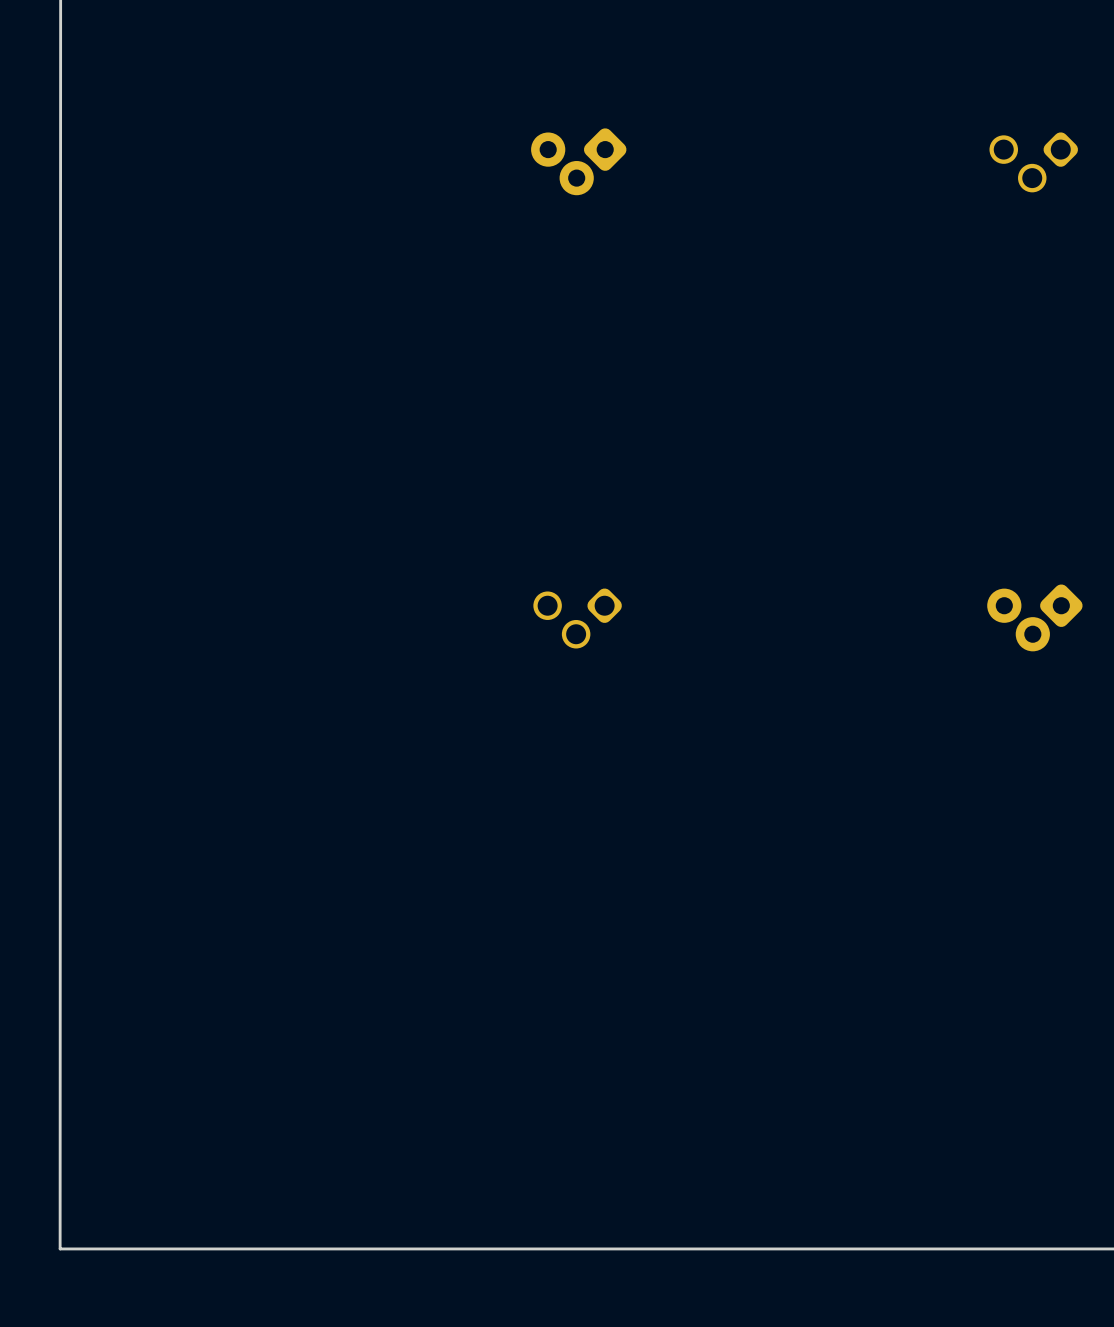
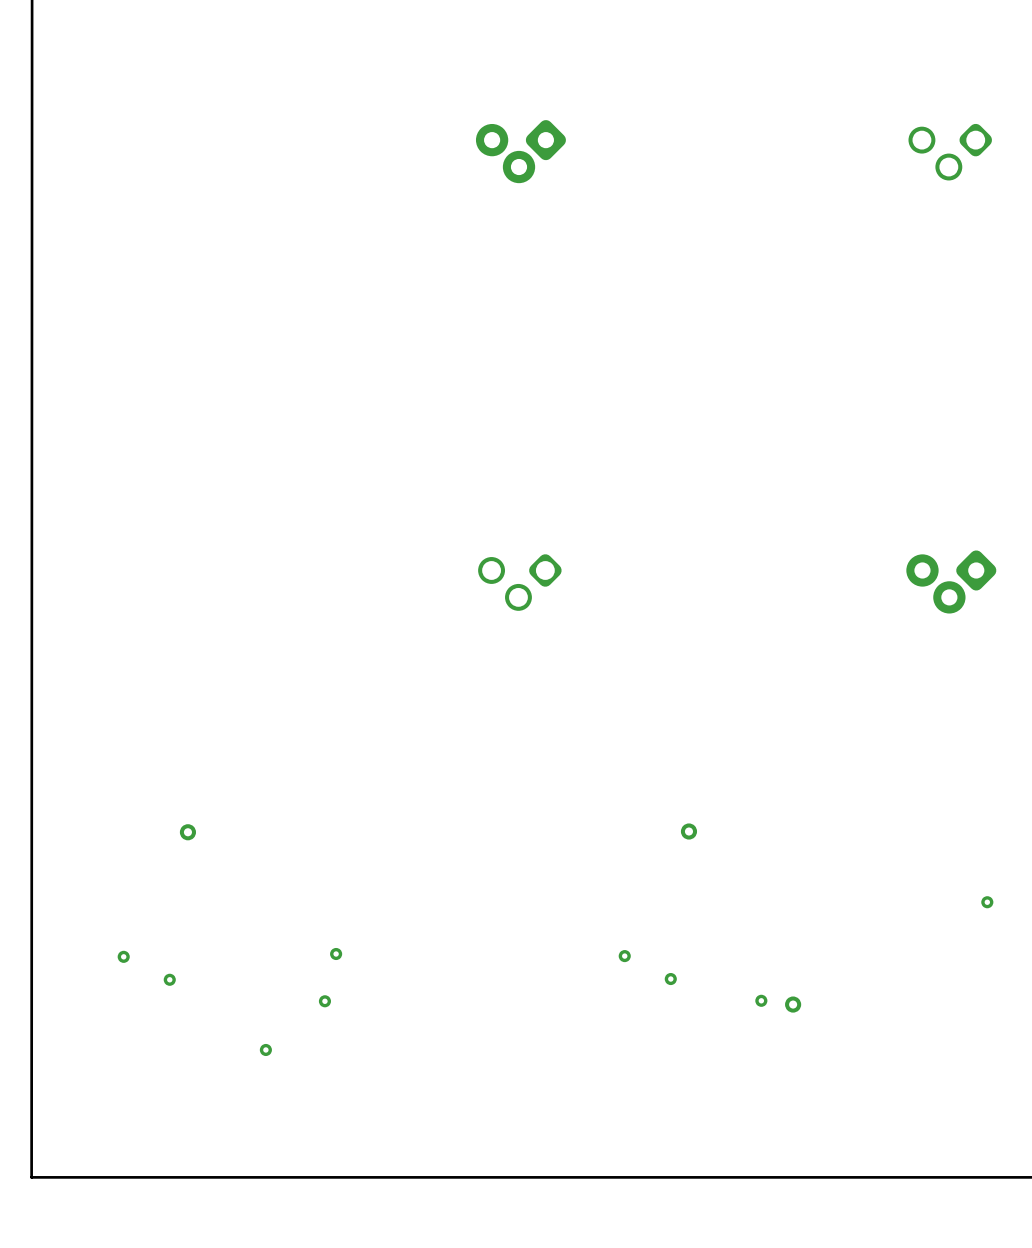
via: none -> (688, 831)
via: none -> (187, 832)
via: none -> (987, 902)
via: none -> (336, 954)
via: none -> (624, 956)
via: none -> (123, 956)
via: none -> (670, 979)
via: none -> (169, 979)
via: none -> (761, 1000)
via: none -> (324, 1001)
via: none -> (793, 1004)
via: none -> (265, 1049)

